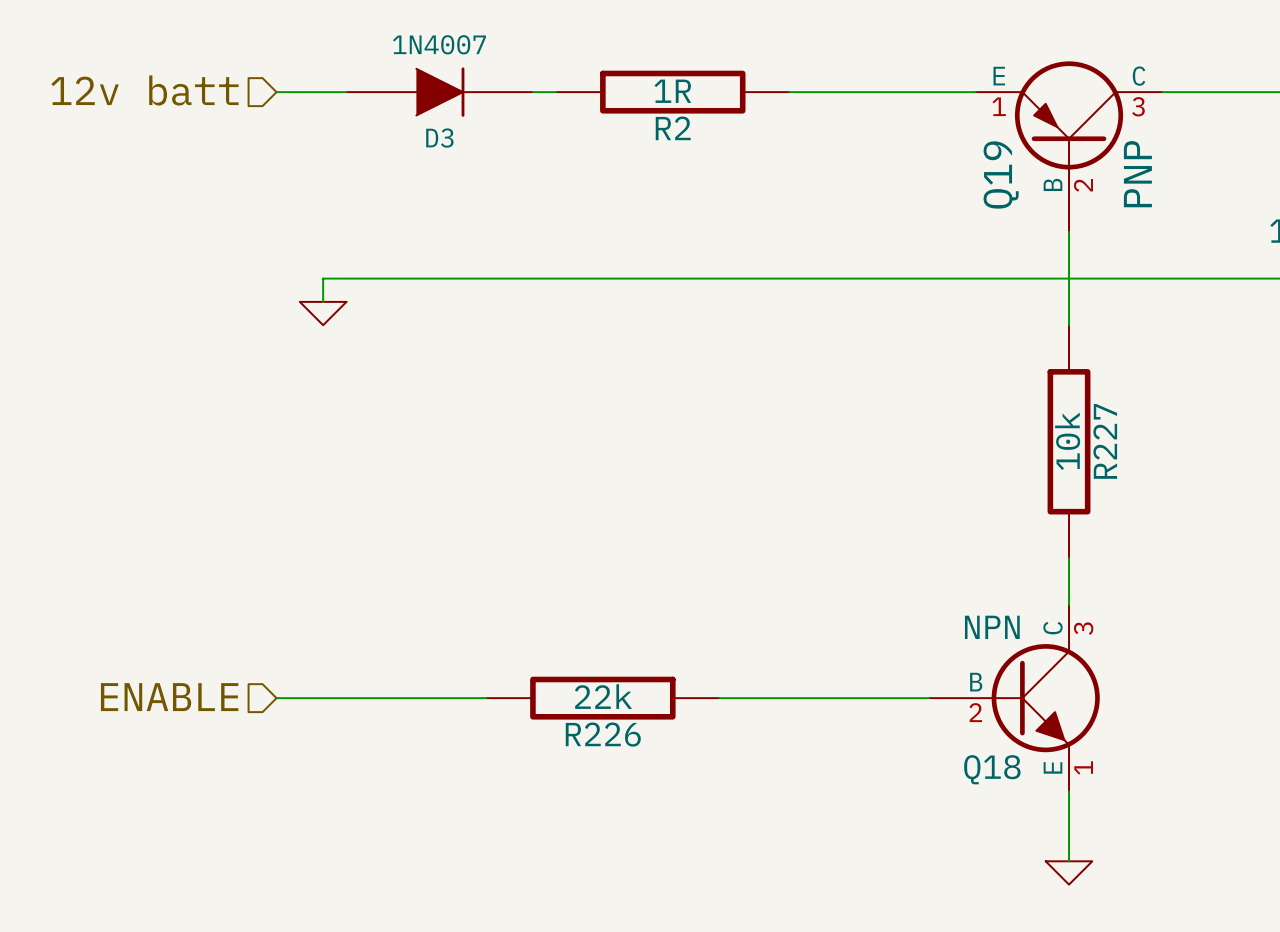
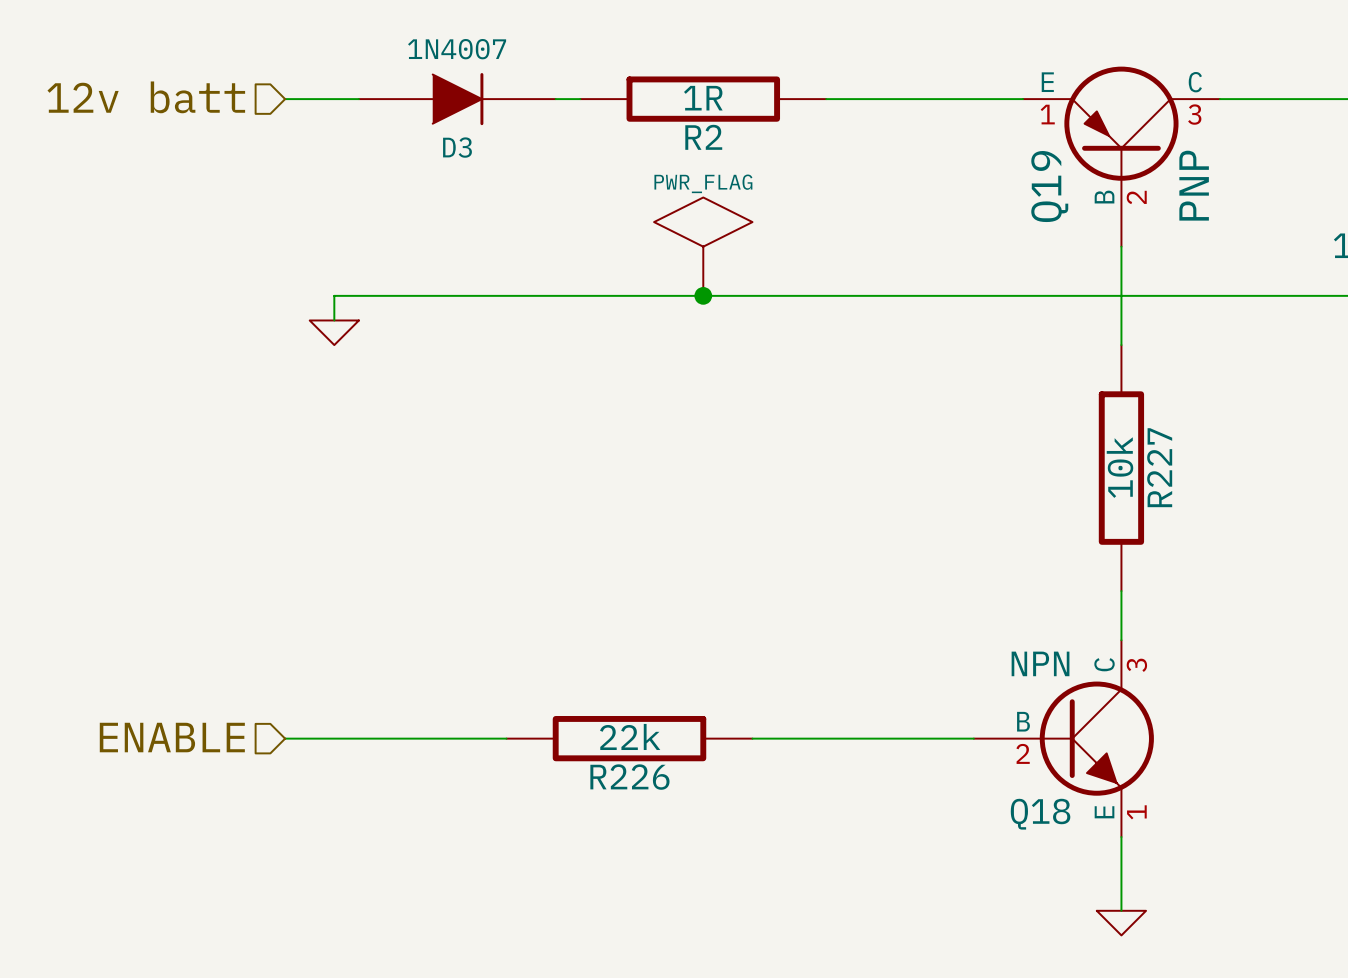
power symbol: none -> PWR_FLAG (703, 246)
junction: none -> (703, 295)

